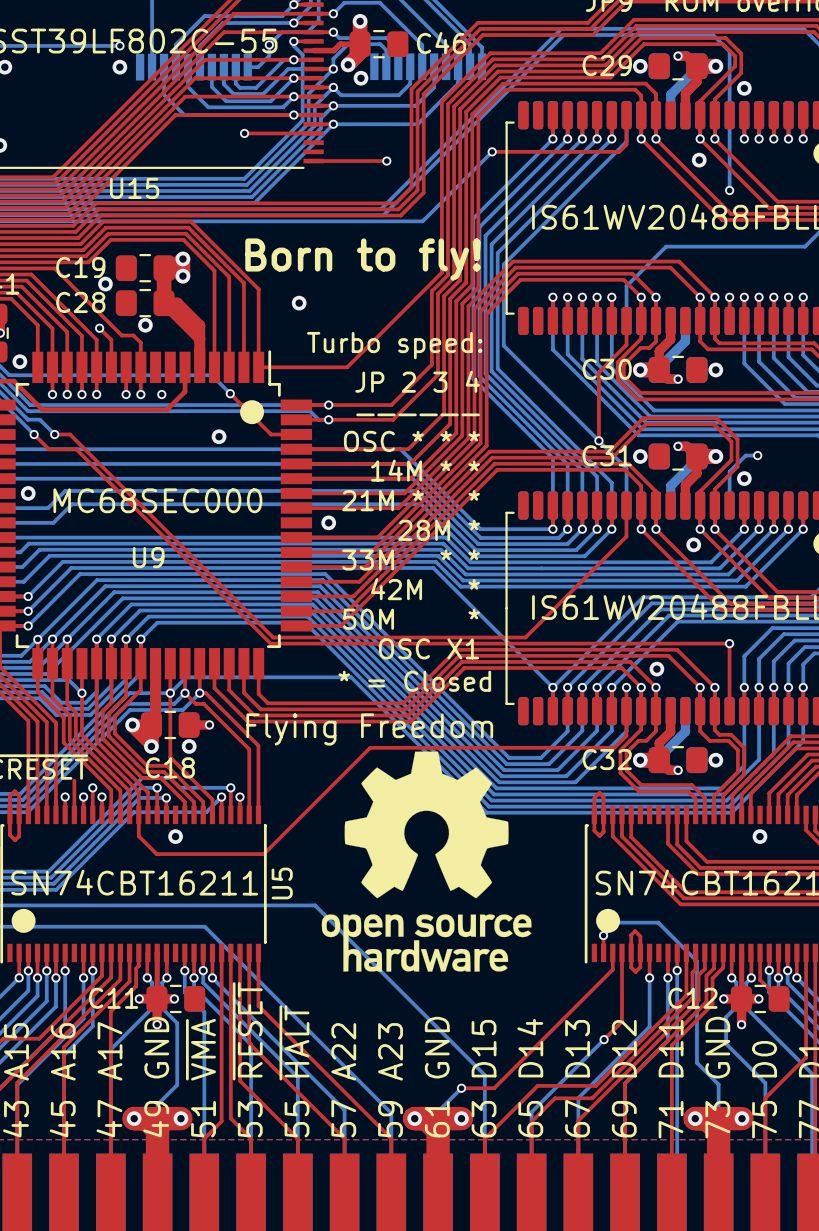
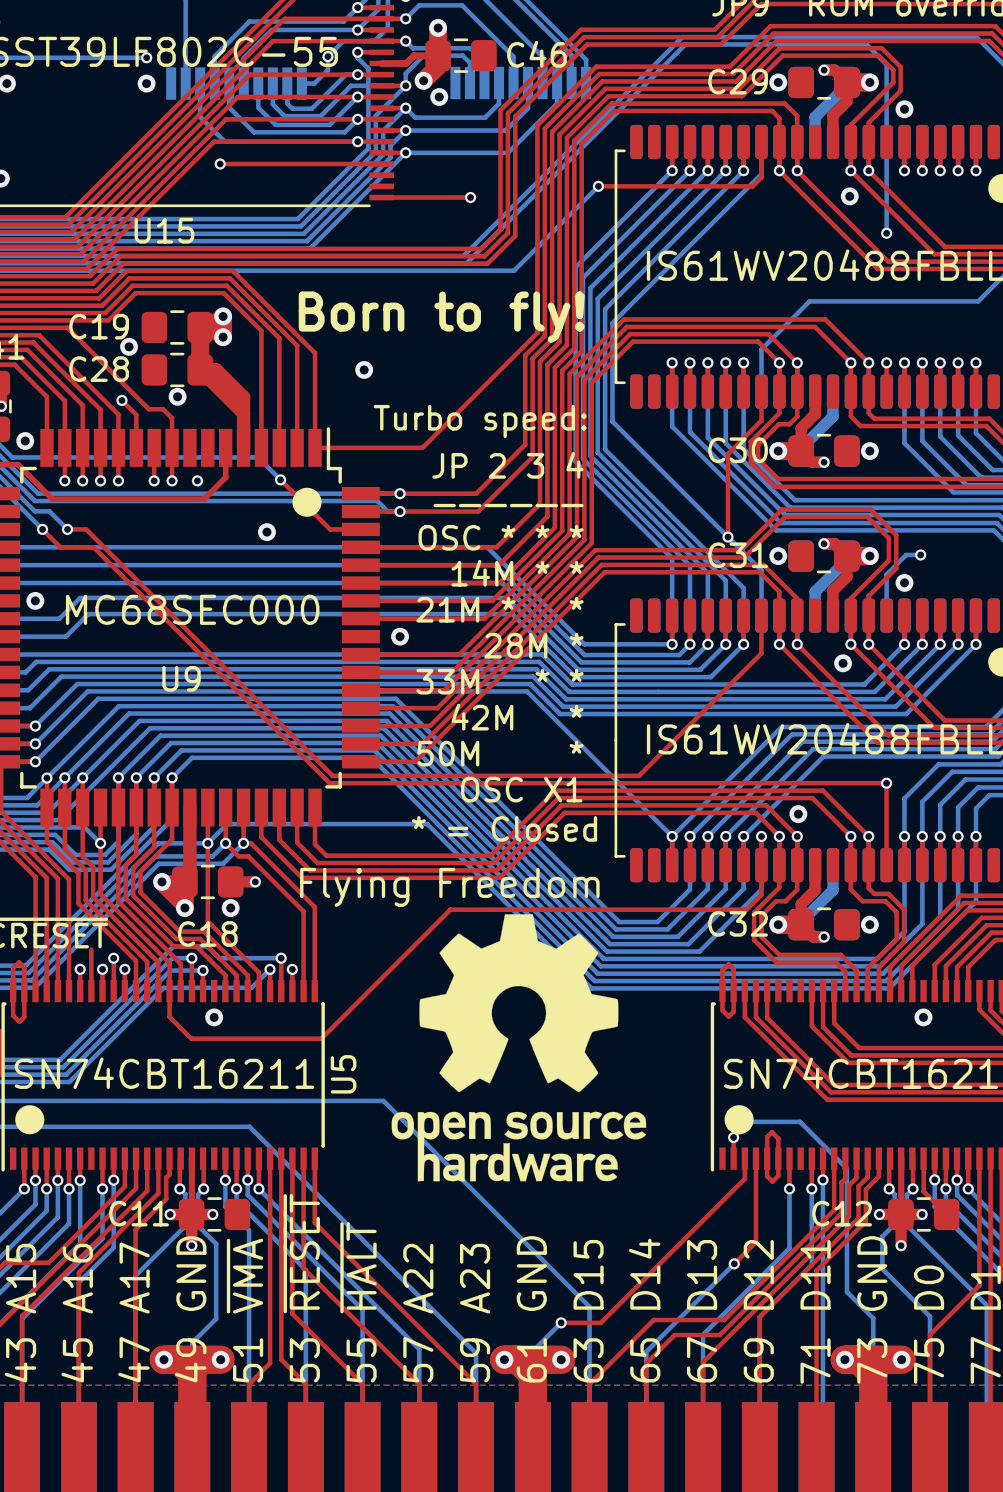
top track: none -> (220, 164) (297, 164)
via position: (244, 133) -> (220, 164)

